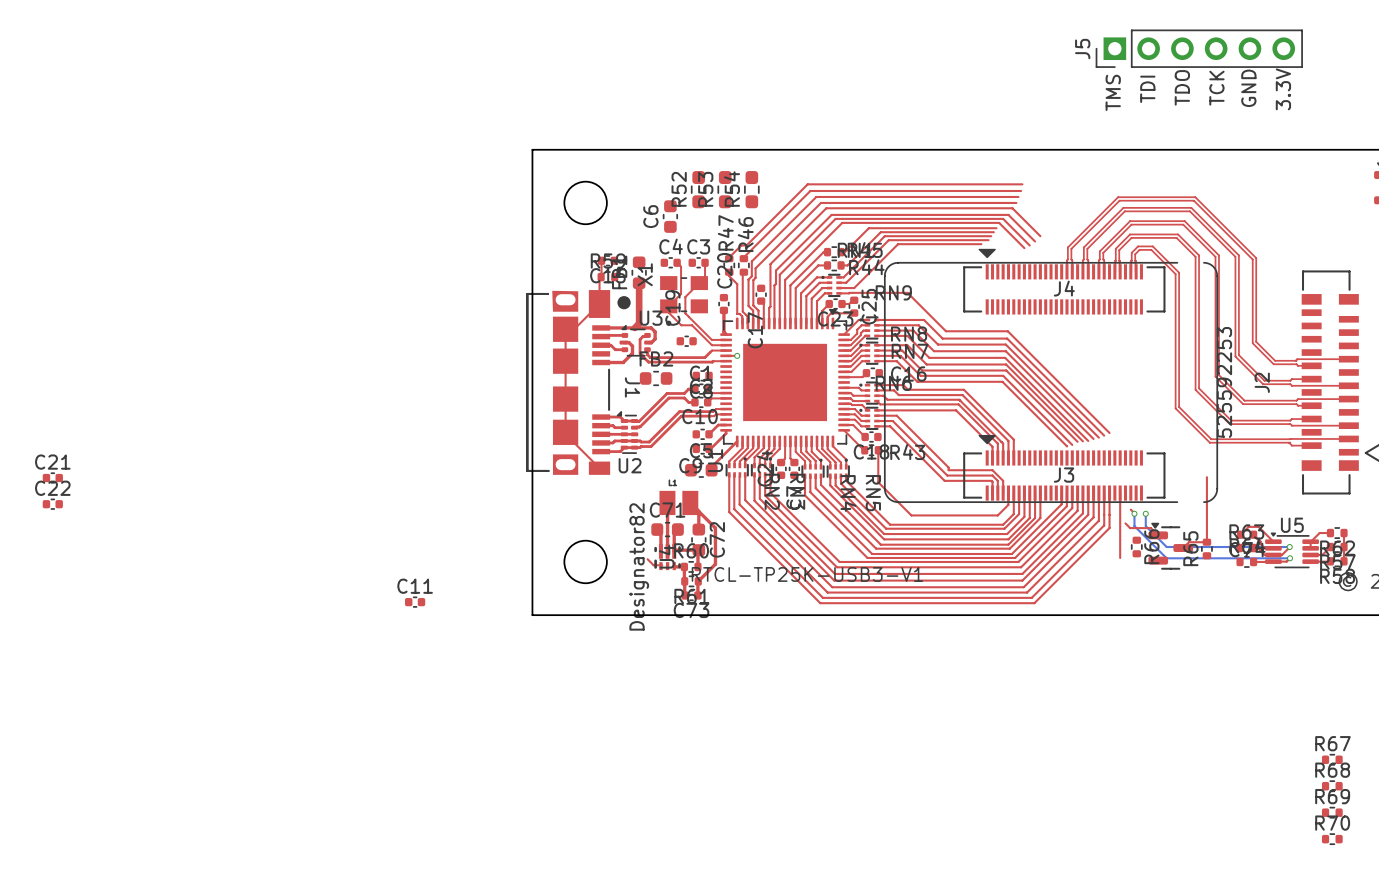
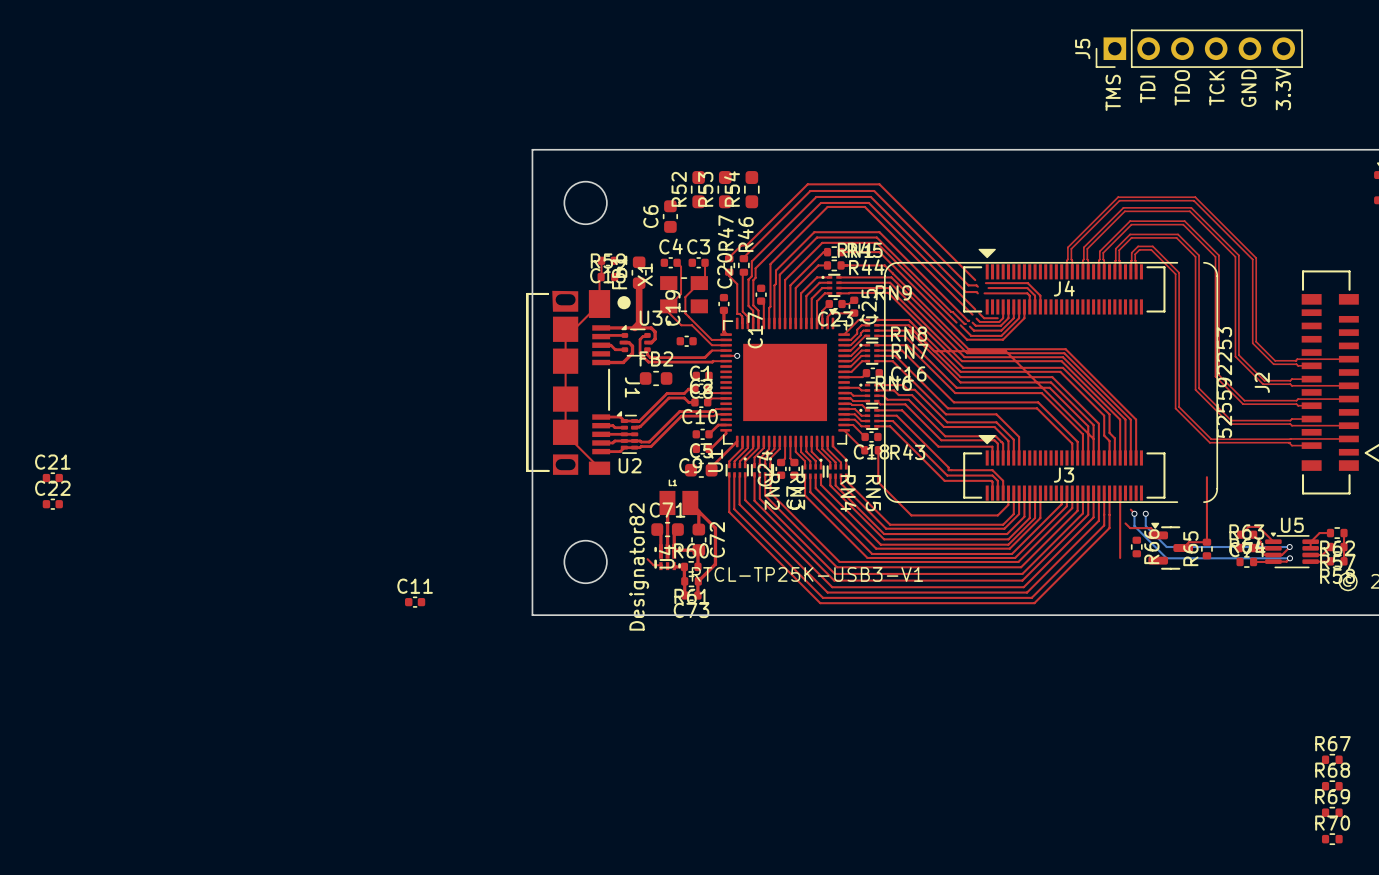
top track: (879, 184) (1022, 184) -> (879, 184) (975, 280)
top track: (874, 190) (1021, 190) -> (874, 190) (968, 285) (977, 286)
top track: (870, 196) (1018, 196) -> (870, 196) (965, 292) (977, 293)
top track: (868, 202) (1016, 202) -> (868, 202) (975, 309)
top track: (826, 208) (1012, 208) (1040, 236) -> (826, 208) (864, 206) (972, 314)
top track: (996, 228) (868, 228) (844, 252) -> (1024, 306) (1024, 318) (1002, 339) (967, 339) (879, 252) (844, 252)
top track: (814, 232) (831, 214) (1008, 214) (1035, 241) -> (814, 232) (879, 232) (969, 320)
top track: (993, 232) (880, 232) (847, 265) -> (1136, 457) (1136, 419) (1065, 349) (968, 349) (884, 265) (847, 265)
top track: (991, 236) (884, 236) (843, 277) -> (1130, 457) (1130, 419) (1064, 353) (967, 353) (891, 277) (843, 277)
top track: (817, 237) (835, 218) (1003, 218) (1029, 245) -> (817, 237) (876, 237) (951, 311) (965, 323)
top track: (988, 240) (888, 240) (846, 282) -> (1125, 457) (1125, 419) (1063, 357) (964, 357) (890, 282) (846, 282)
top track: (822, 242) (842, 222) (999, 222) (1024, 248) -> (822, 242) (876, 242) (956, 322)
top track: (981, 244) (898, 244) (854, 288) -> (1120, 457) (1120, 419) (1061, 361) (961, 361) (888, 288) (854, 288)
top track: none -> (985, 283) (1027, 283) (1040, 295) (1040, 306)
top track: none -> (988, 288) (1027, 288) (1035, 295) (1035, 306)
top track: (888, 292) (907, 292) (945, 331) (1007, 331) (1109, 432) -> (888, 292) (963, 367) (1062, 367) (1109, 414) (1109, 432) (1114, 438) (1114, 457)
top track: none -> (984, 293) (1027, 293) (1029, 295) (1029, 306)
top track: none -> (1003, 306) (1003, 318) (999, 322) (979, 322) (976, 318)
top track: none -> (1008, 306) (1008, 318) (1000, 325) (975, 325) (972, 322)
top track: none -> (1013, 306) (1013, 318) (1001, 330) (973, 330) (969, 326)
top track: none -> (1019, 306) (1019, 318) (1001, 335) (971, 335) (960, 325)
top track: none -> (979, 313) (984, 318) (997, 318)
top track: (908, 319) (924, 319) (942, 338) (1007, 338) (1051, 382) -> (908, 330) (960, 382) (1051, 382)
top track: none -> (908, 319) (960, 371) (1060, 371) (1104, 415) (1104, 435) (1109, 440) (1109, 457)
top track: (908, 325) (918, 325) (938, 344) (1005, 344) (1098, 437) -> (908, 325) (960, 377) (1052, 377) (1098, 423) (1098, 457)
top track: (904, 335) (907, 335) (929, 357) (1005, 357) (1088, 440) -> (904, 335) (956, 387) (1049, 387) (1088, 426) (1088, 457)
top track: (895, 355) (900, 355) (920, 375) (1003, 375) (1072, 444) -> (895, 355) (947, 408) (1037, 408) (1072, 443) (1072, 457)
top track: (892, 361) (896, 361) (917, 381) (1002, 381) (1066, 446) -> (892, 361) (945, 414) (996, 414) (1019, 436) (1019, 457)
top track: (926, 364) (1006, 364) (1082, 441) -> (926, 364) (955, 393) (1041, 393) (1082, 434) (1082, 457)
top track: (922, 370) (1006, 370) (1038, 402) -> (922, 370) (953, 402) (1038, 402)
top track: (914, 389) (963, 389) (996, 422) -> (914, 389) (947, 422) (996, 422)
top track: (912, 395) (962, 395) (994, 427) -> (912, 395) (943, 427) (994, 427)
top track: (908, 399) (959, 399) (995, 436) -> (908, 399) (945, 436) (995, 436)
top track: (905, 404) (958, 404) (994, 440) -> (905, 404) (941, 440) (994, 440)
top track: (902, 410) (956, 410) (992, 446) (992, 455) -> (902, 410) (938, 446) (992, 446) (992, 455)
top track: (1093, 425) (1104, 435) -> (1093, 425) (1093, 457)
top track: none -> (1077, 441) (1077, 457)

